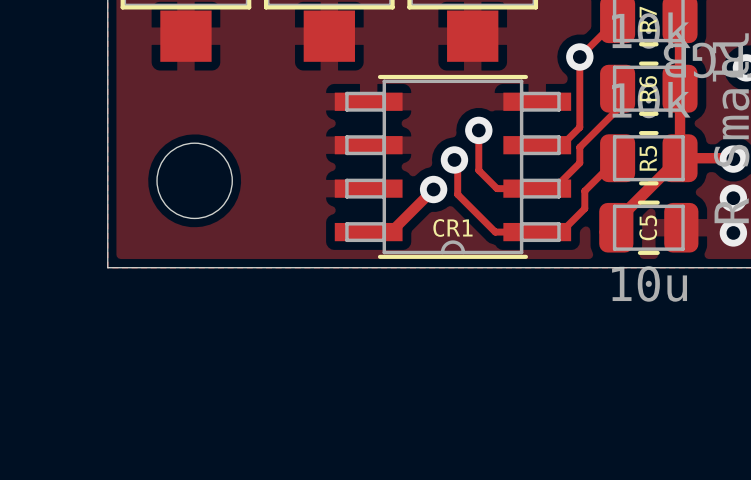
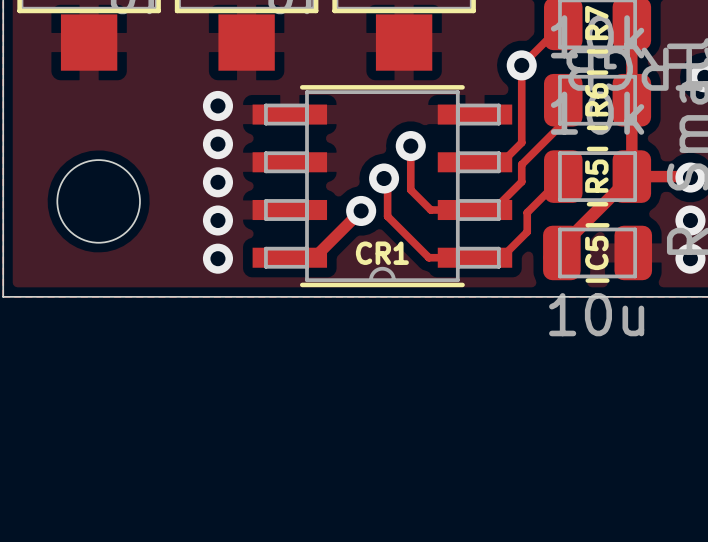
via: none -> (217, 105)
via: none -> (217, 144)
via: none -> (217, 182)
via: none -> (217, 220)
via: none -> (217, 258)

